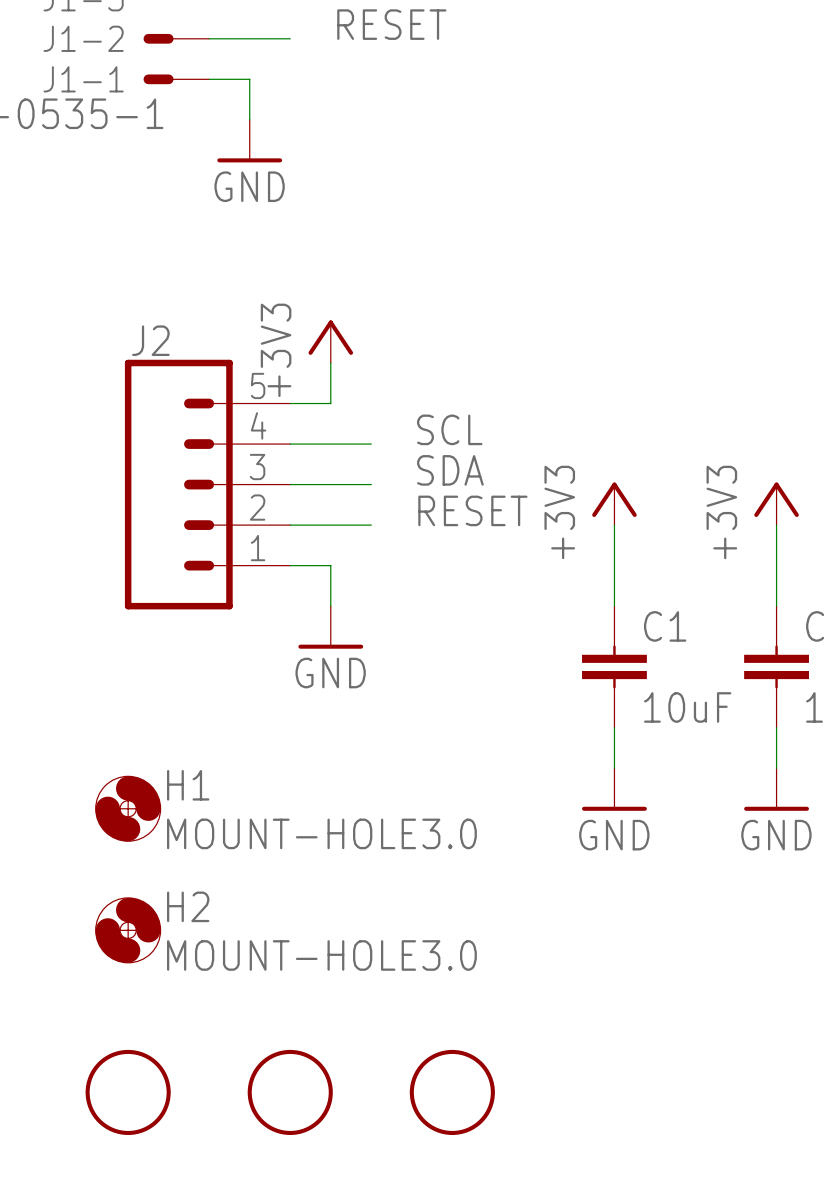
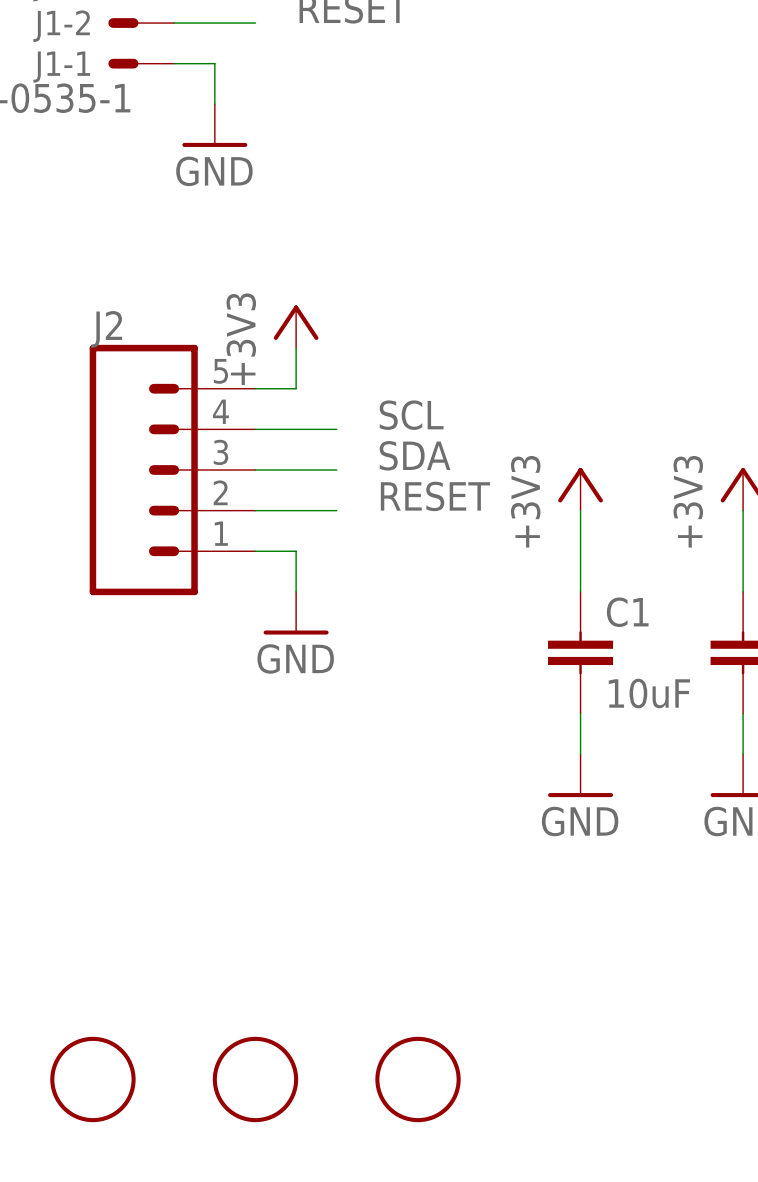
H1: MOUNT-HOLE3.0 (128, 808) -> none
H2: MOUNT-HOLE3.0 (128, 930) -> none

